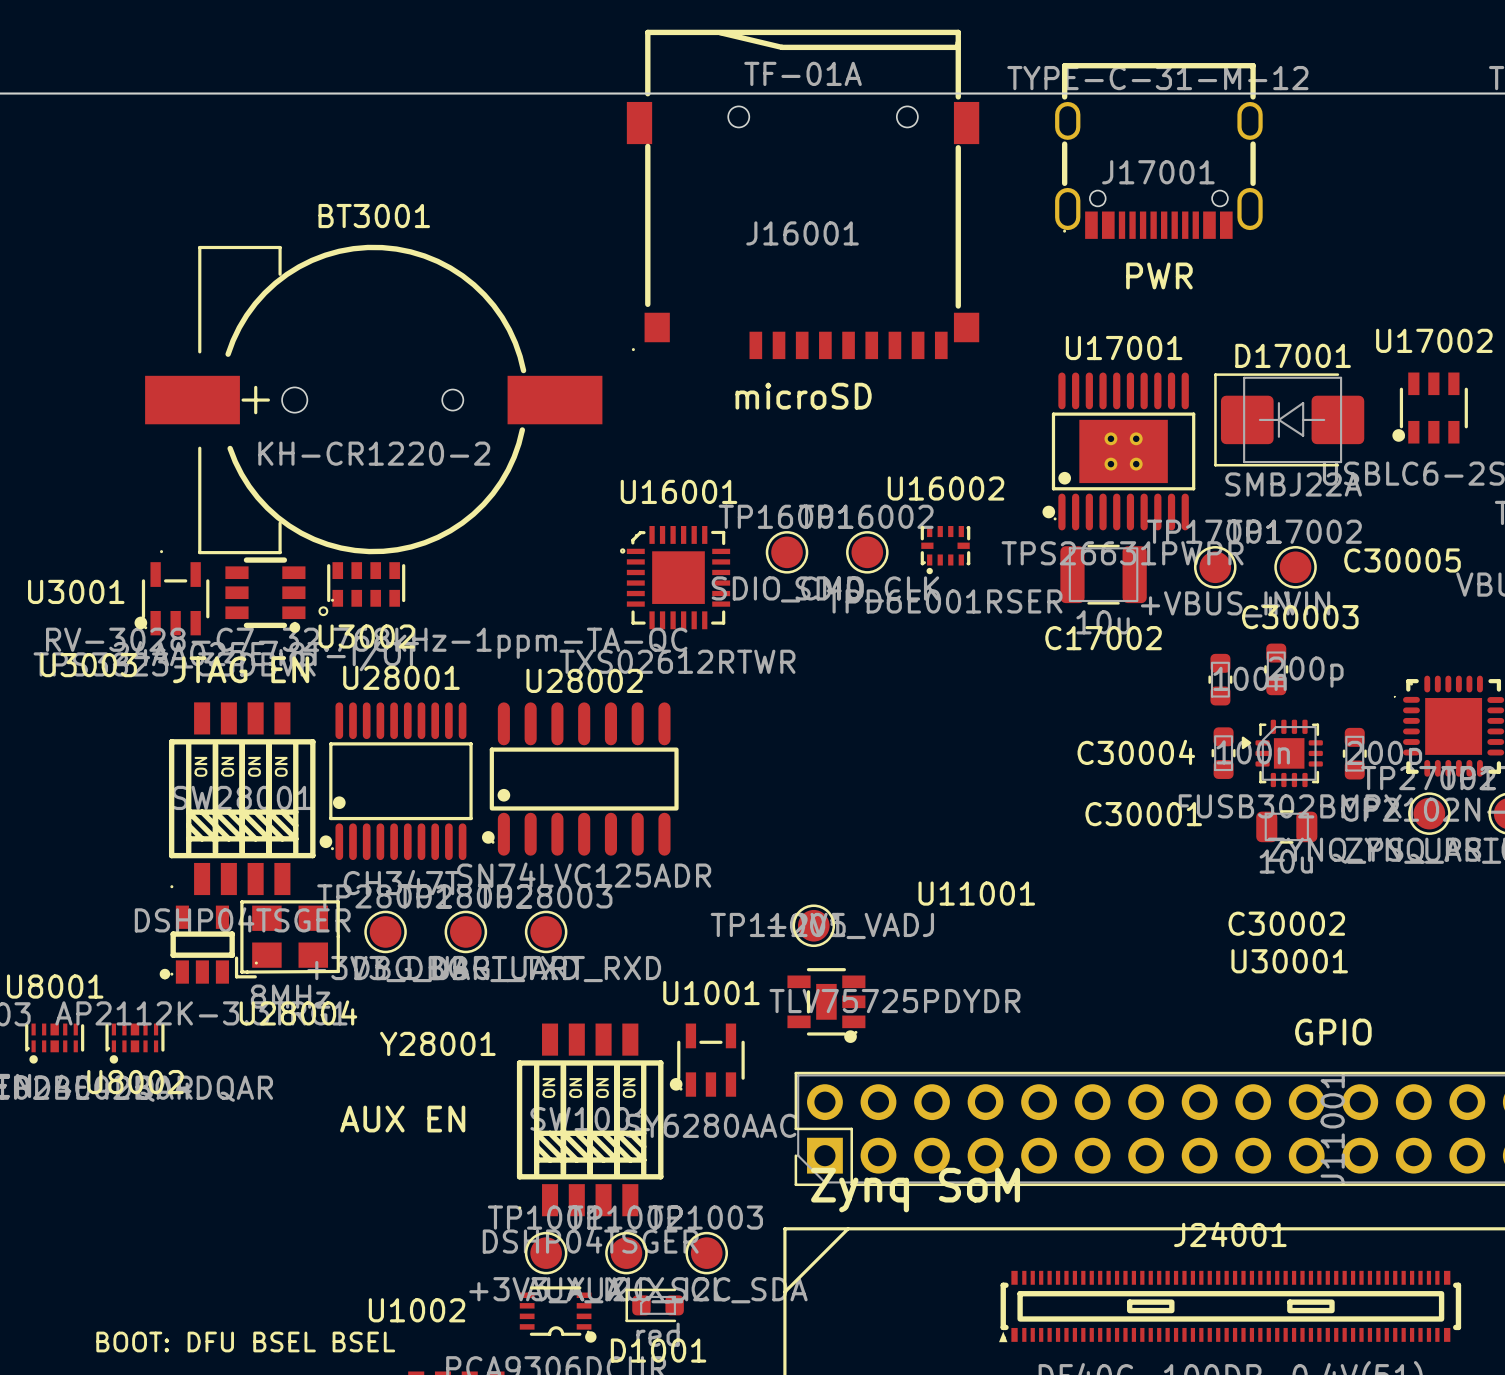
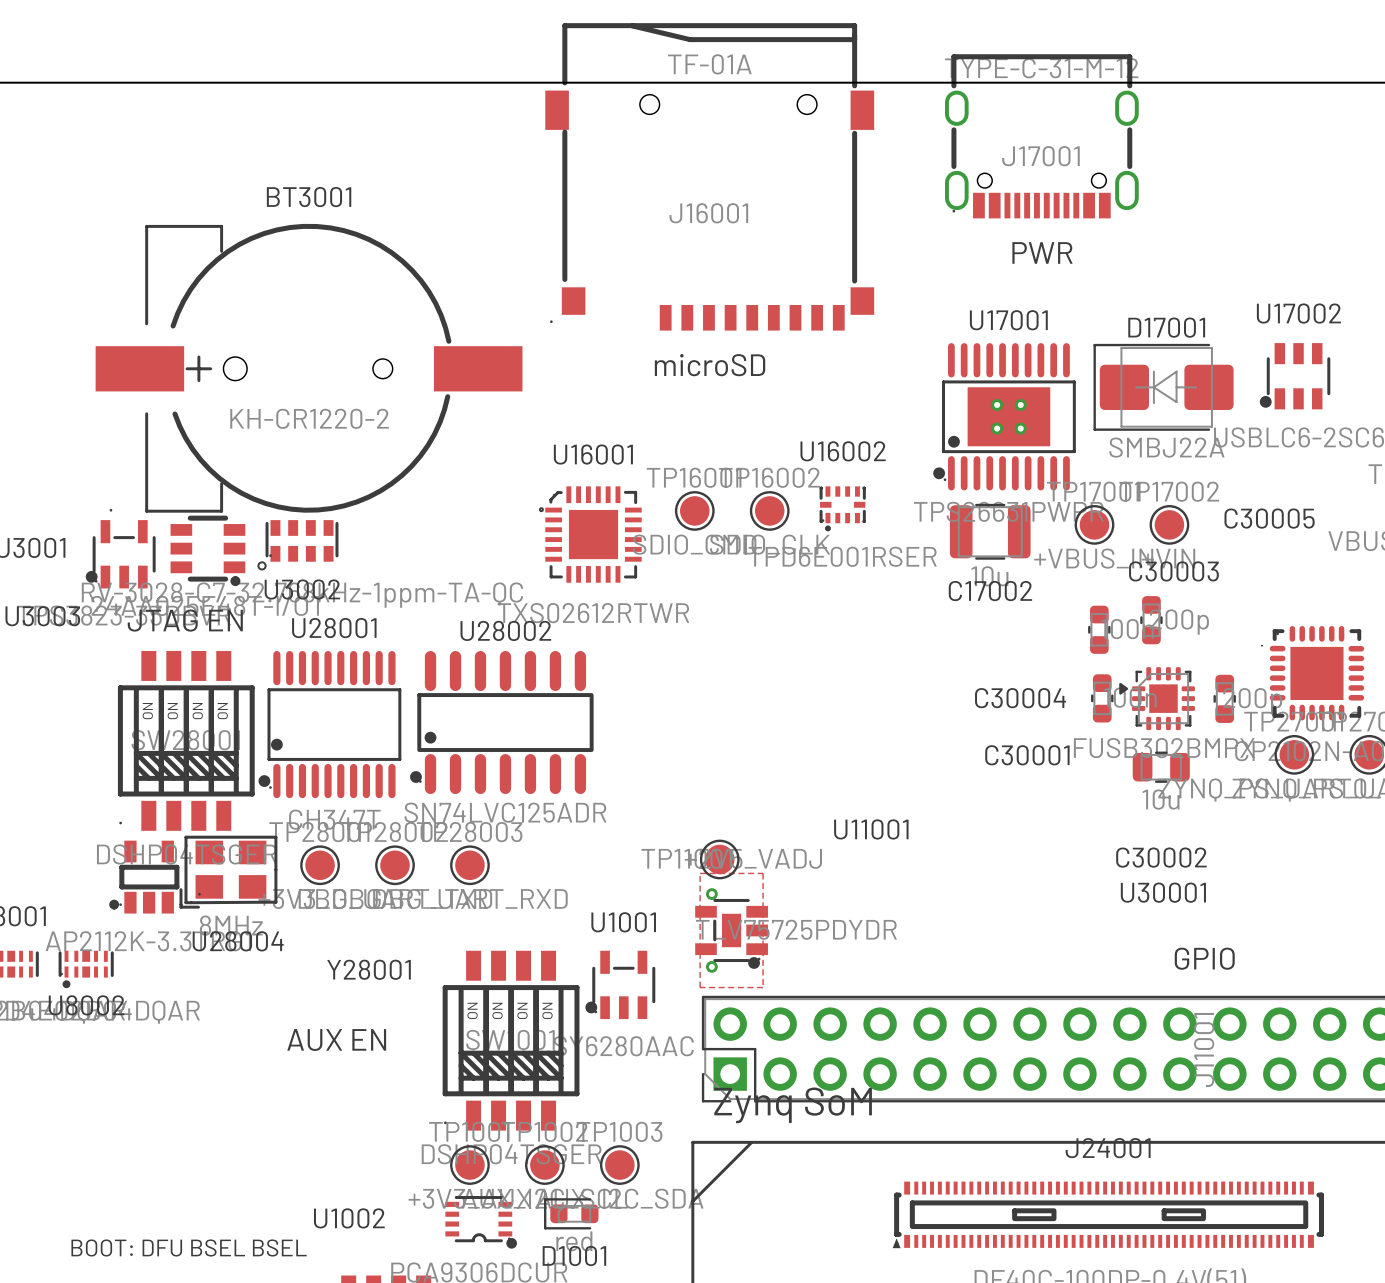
zone outline: none -> (700, 873) (700, 987) (763, 987) (763, 873) (700, 873)
via: none -> (711, 894)
via: none -> (711, 966)

